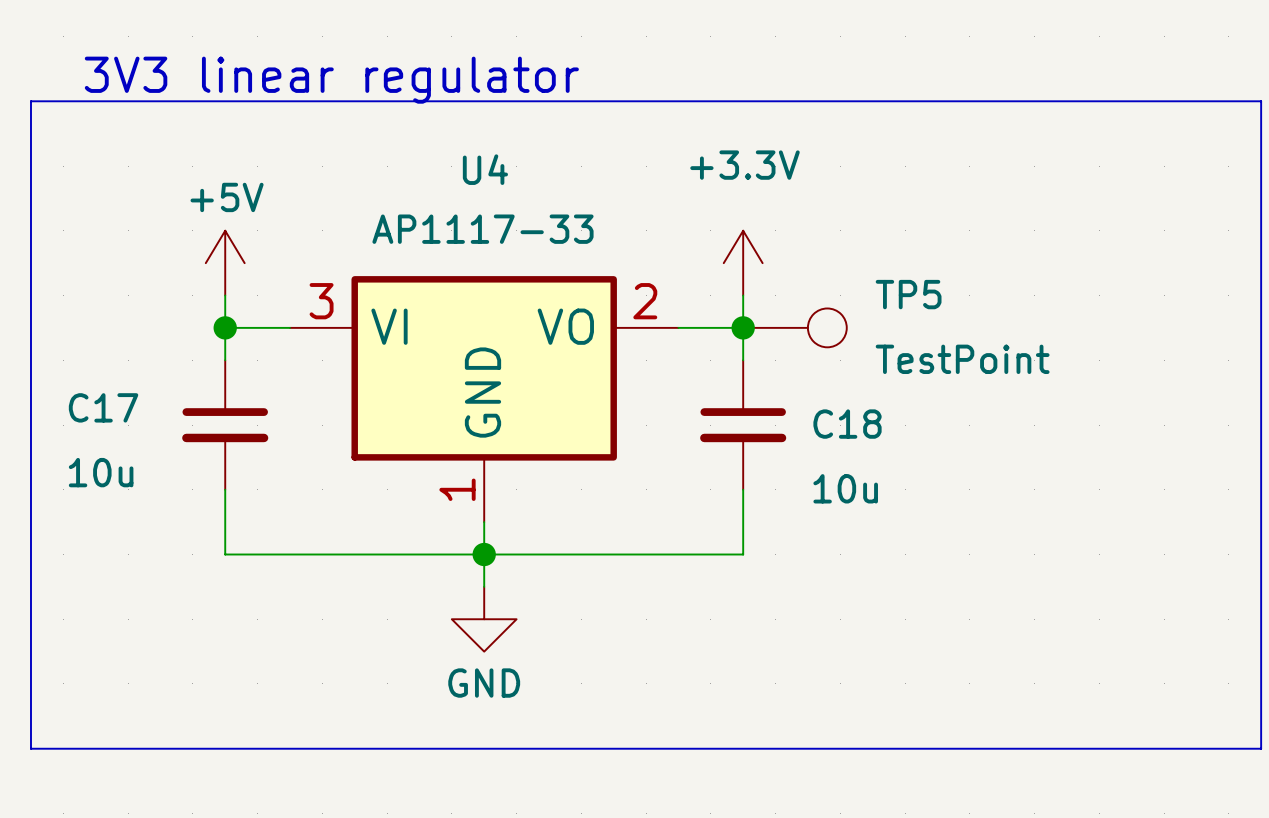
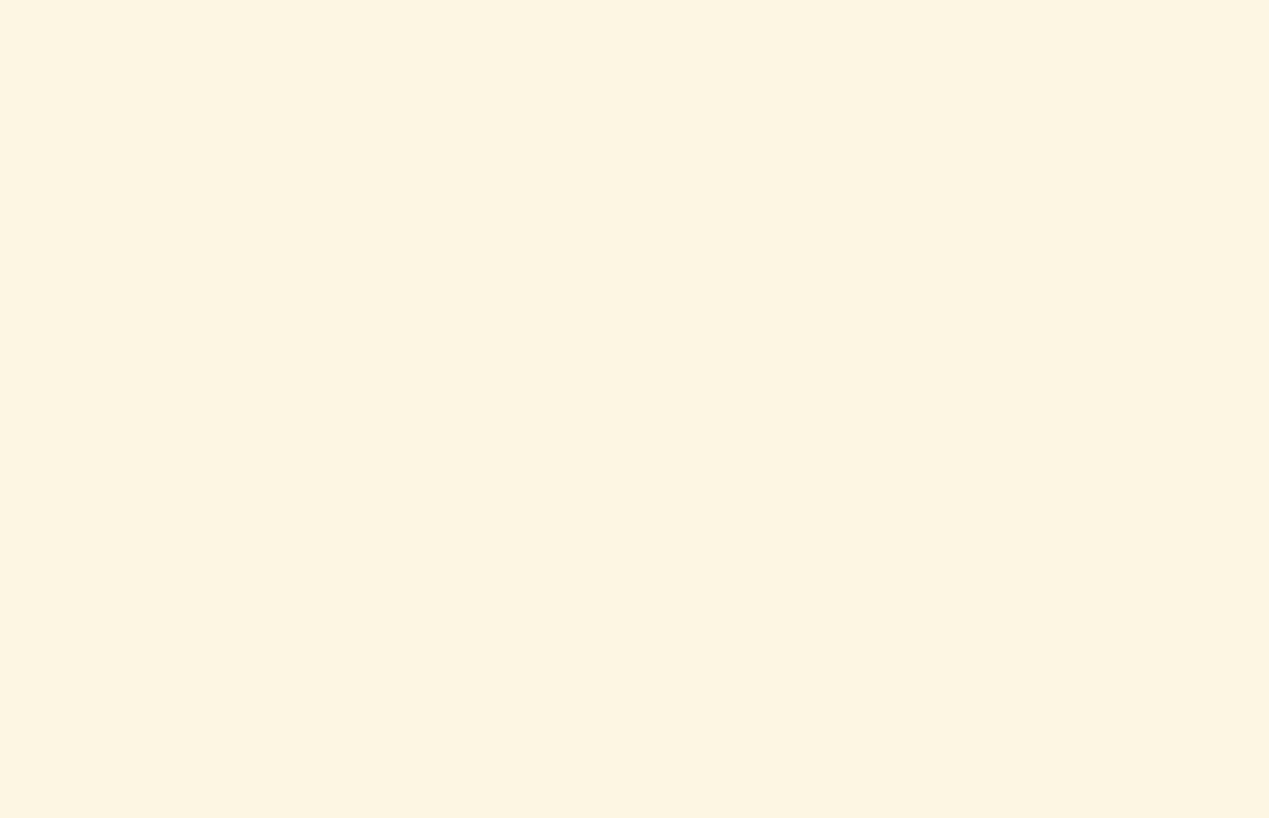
text: 3V3 linear regulator (331, 80) -> none
line: (30, 101) (30, 748) (1261, 748) (1261, 101) (30, 101) -> none
power symbol: +5V (225, 263) -> none
power symbol: +3.3V (743, 263) -> none
wire: (225, 295) (225, 360) -> none
wire: (743, 295) (743, 360) -> none
wire: (225, 327) (289, 327) -> none
junction: (225, 327) -> none
wire: (678, 327) (743, 327) -> none
junction: (743, 327) -> none
TP5: TestPoint (794, 327) -> none
U4: AP1117-33 (484, 399) -> none
C17: 10u (225, 425) -> none
C18: 10u (743, 425) -> none
wire: (225, 489) (225, 554) (743, 554) (743, 489) -> none
wire: (484, 522) (484, 586) -> none
junction: (484, 554) -> none
power symbol: GND (484, 619) -> none

